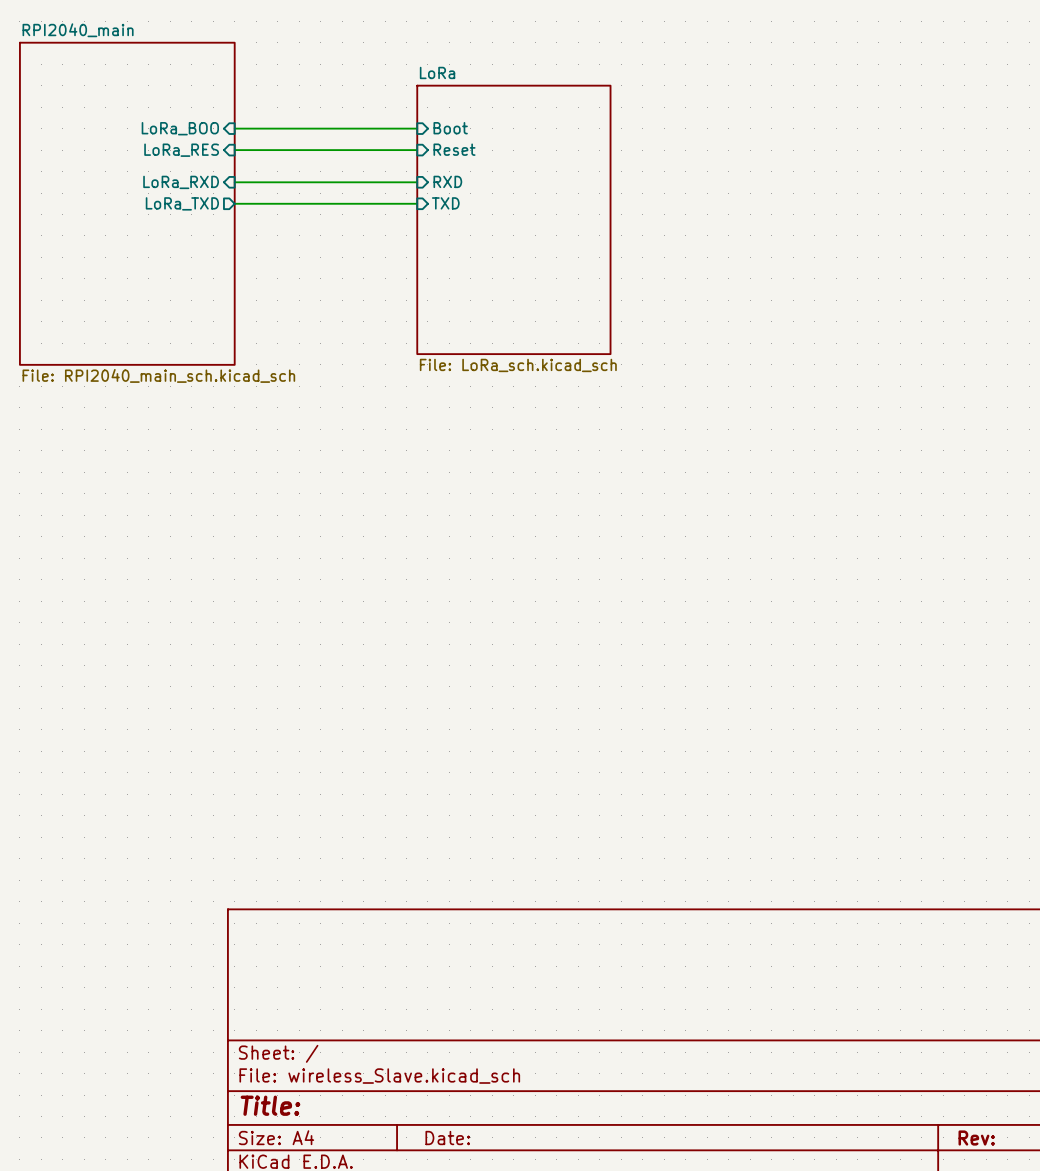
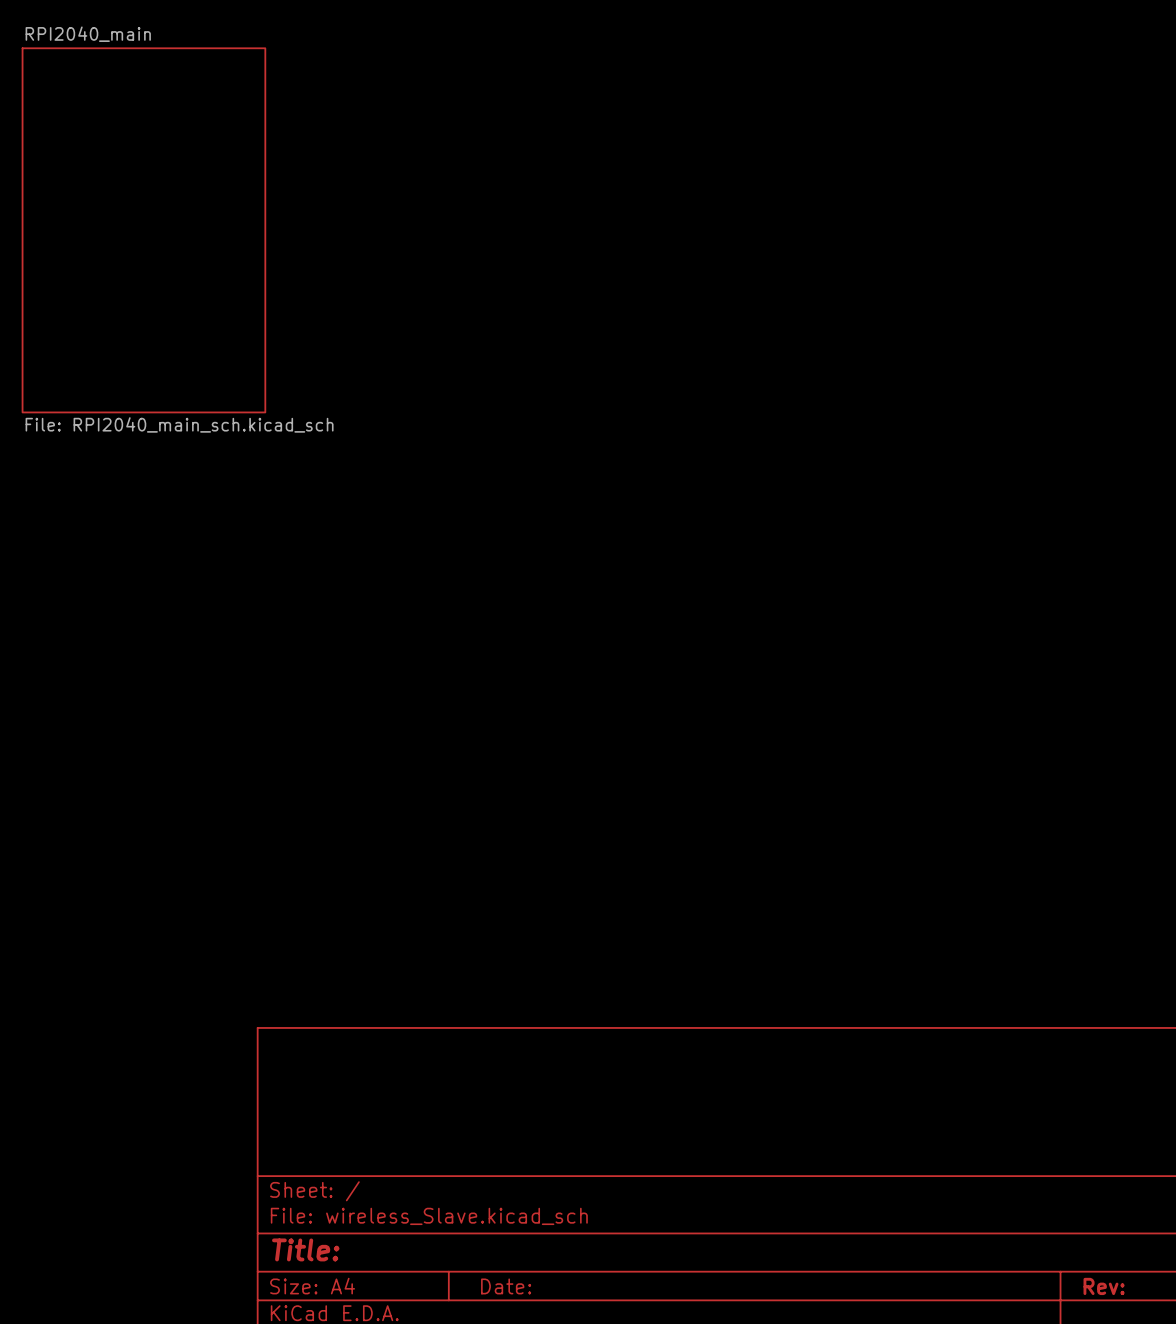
sheet pin: LoRa_BOO (180, 128) -> none
wire: (234, 128) (417, 128) -> none
sheet pin: Boot (450, 128) -> none
sheet pin: Reset (454, 149) -> none
sheet pin: LoRa_RES (181, 150) -> none
wire: (234, 150) (417, 150) -> none
sheet pin: RXD (447, 181) -> none
sheet pin: LoRa_RXD (181, 182) -> none
wire: (234, 182) (417, 182) -> none
sheet pin: LoRa_TXD (182, 203) -> none
wire: (234, 203) (417, 203) -> none
sheet pin: TXD (445, 203) -> none
sheet LoRa: File: LoRa_sch.kicad_sch (513, 219) -> none

